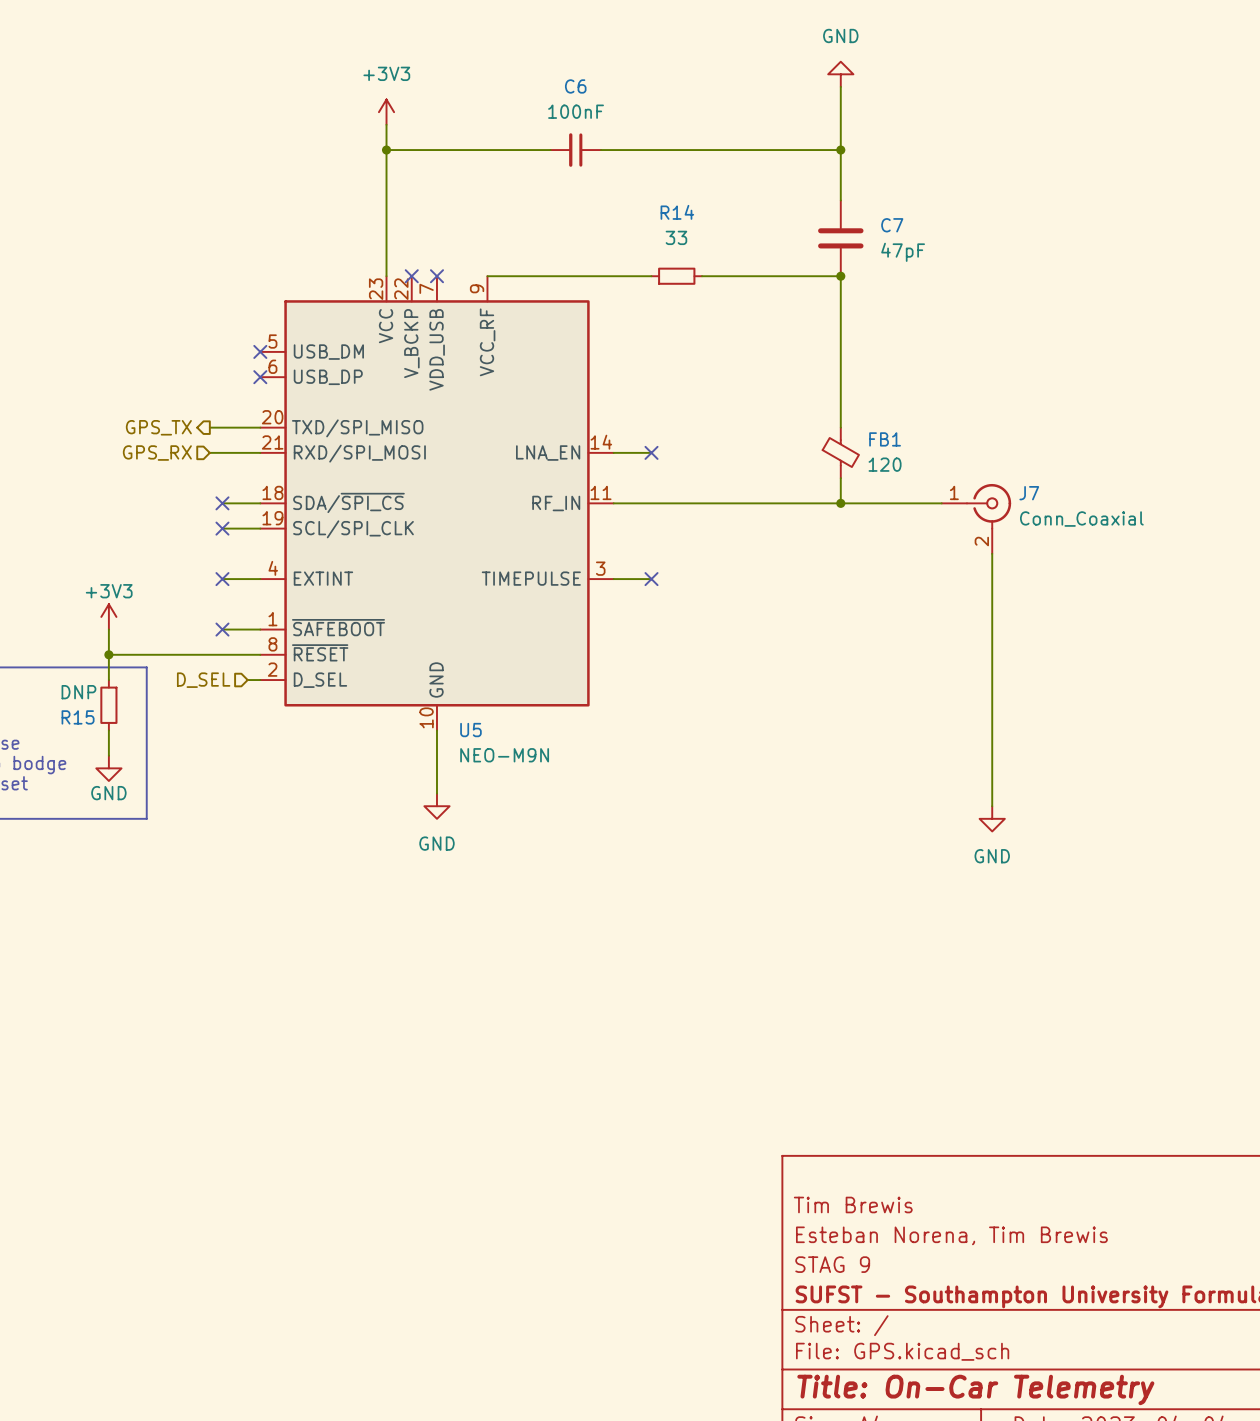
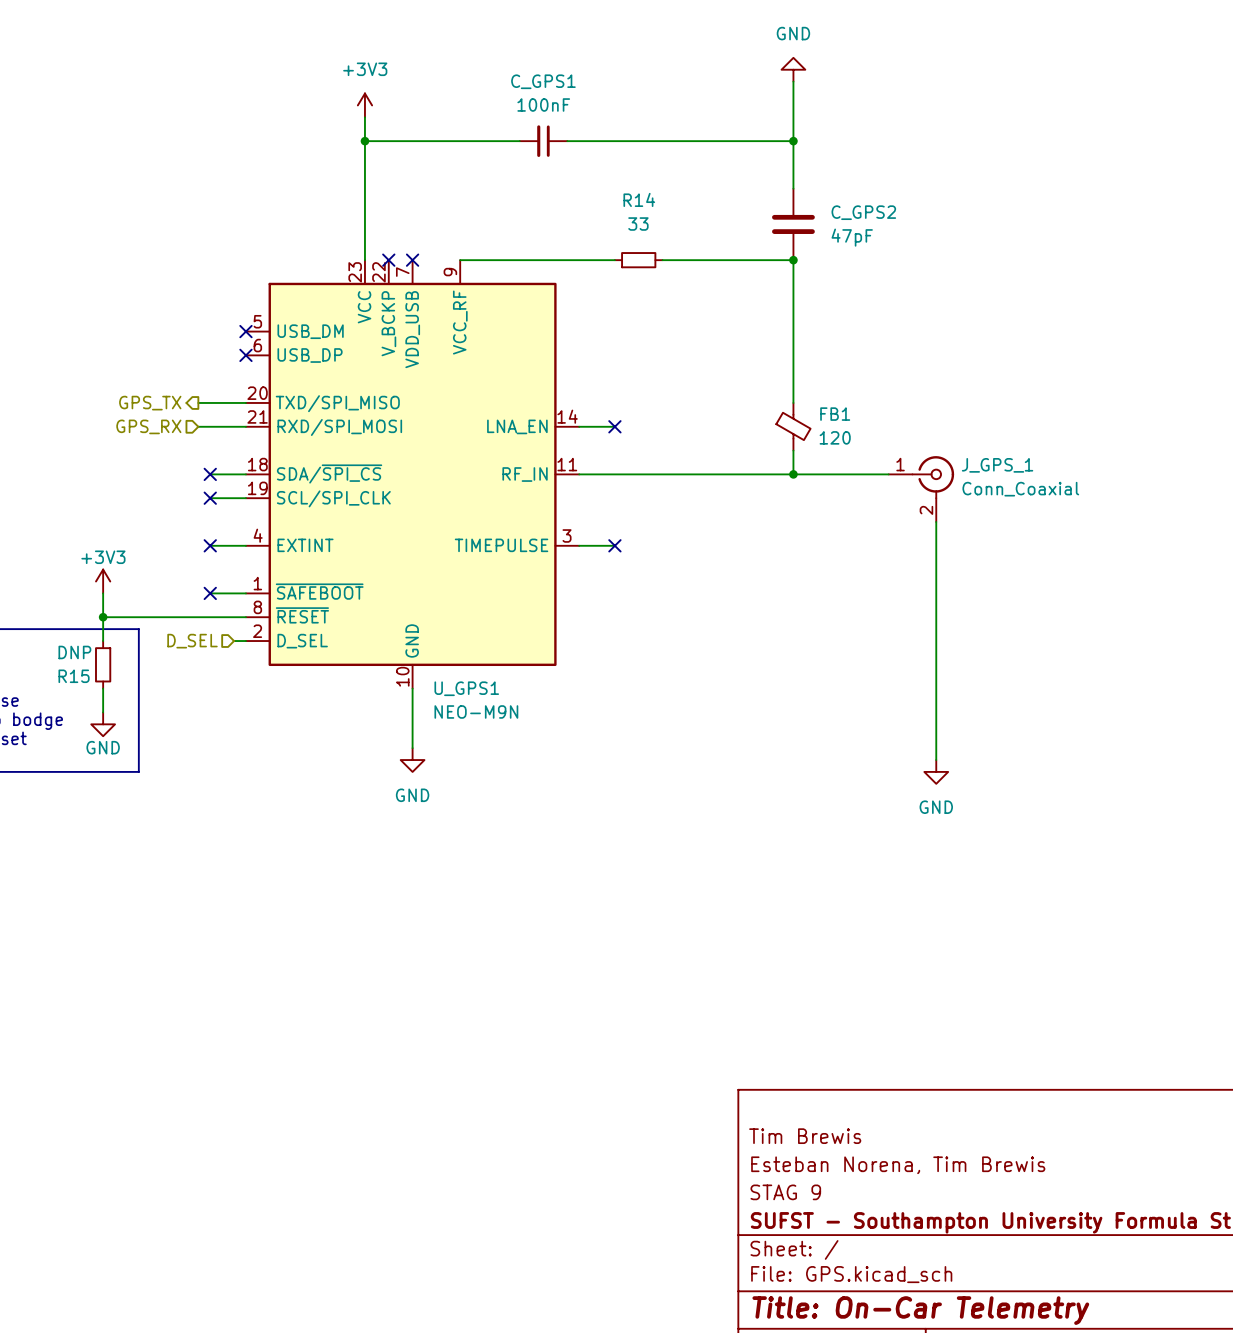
C6 name: C6 (575, 86) -> C_GPS1 (543, 81)
C7 name: C7 (892, 225) -> C_GPS2 (863, 212)
J7 name: J7 (1029, 493) -> J_GPS_1 (997, 465)
U5 name: U5 (470, 730) -> U_GPS1 (466, 688)

